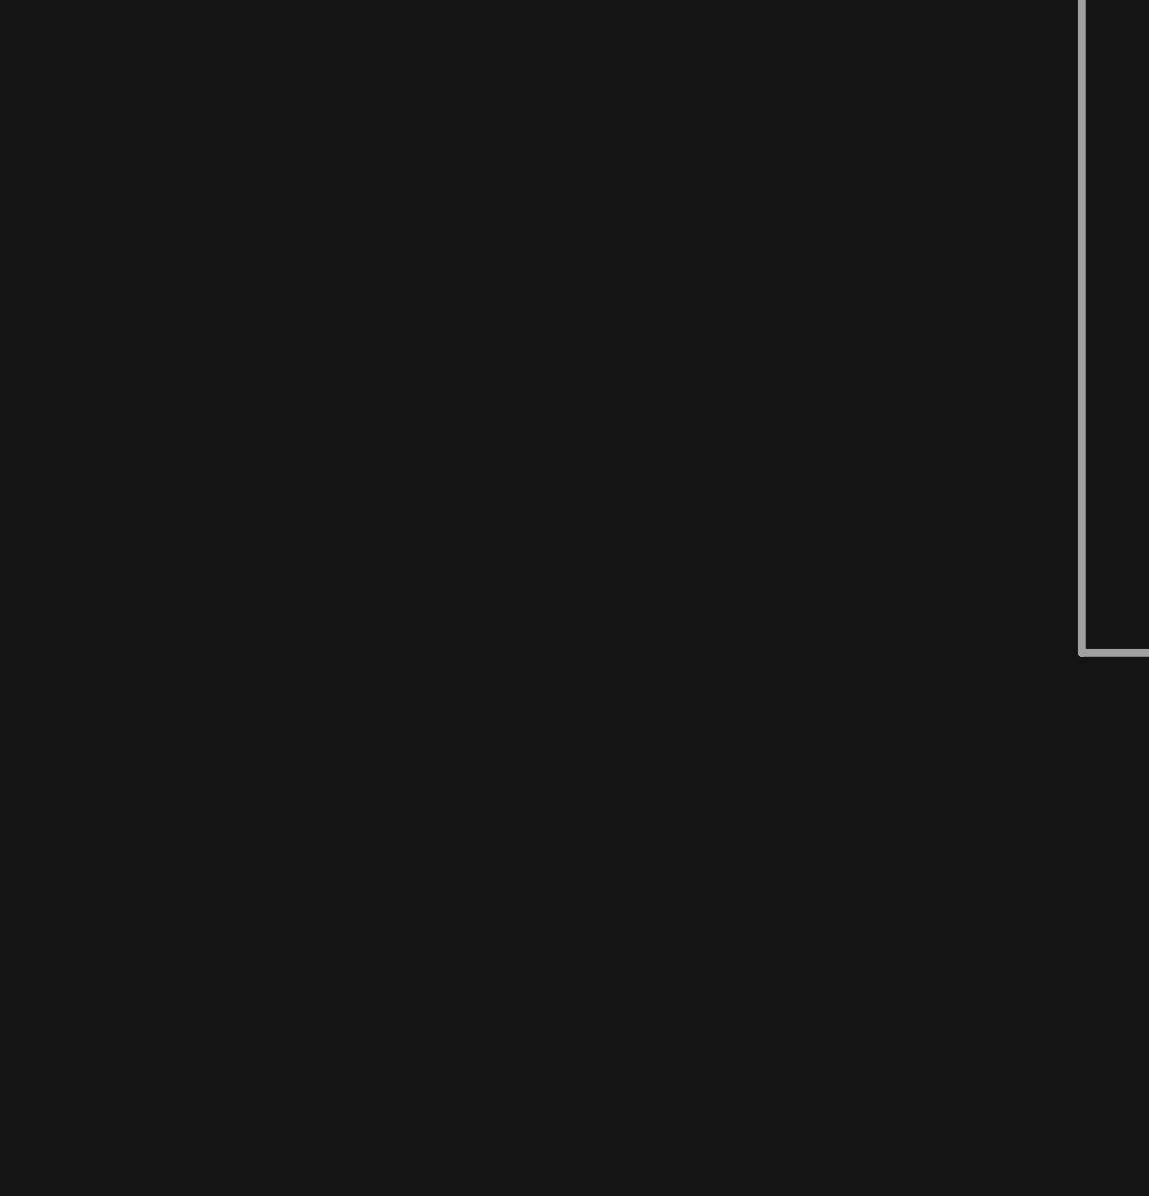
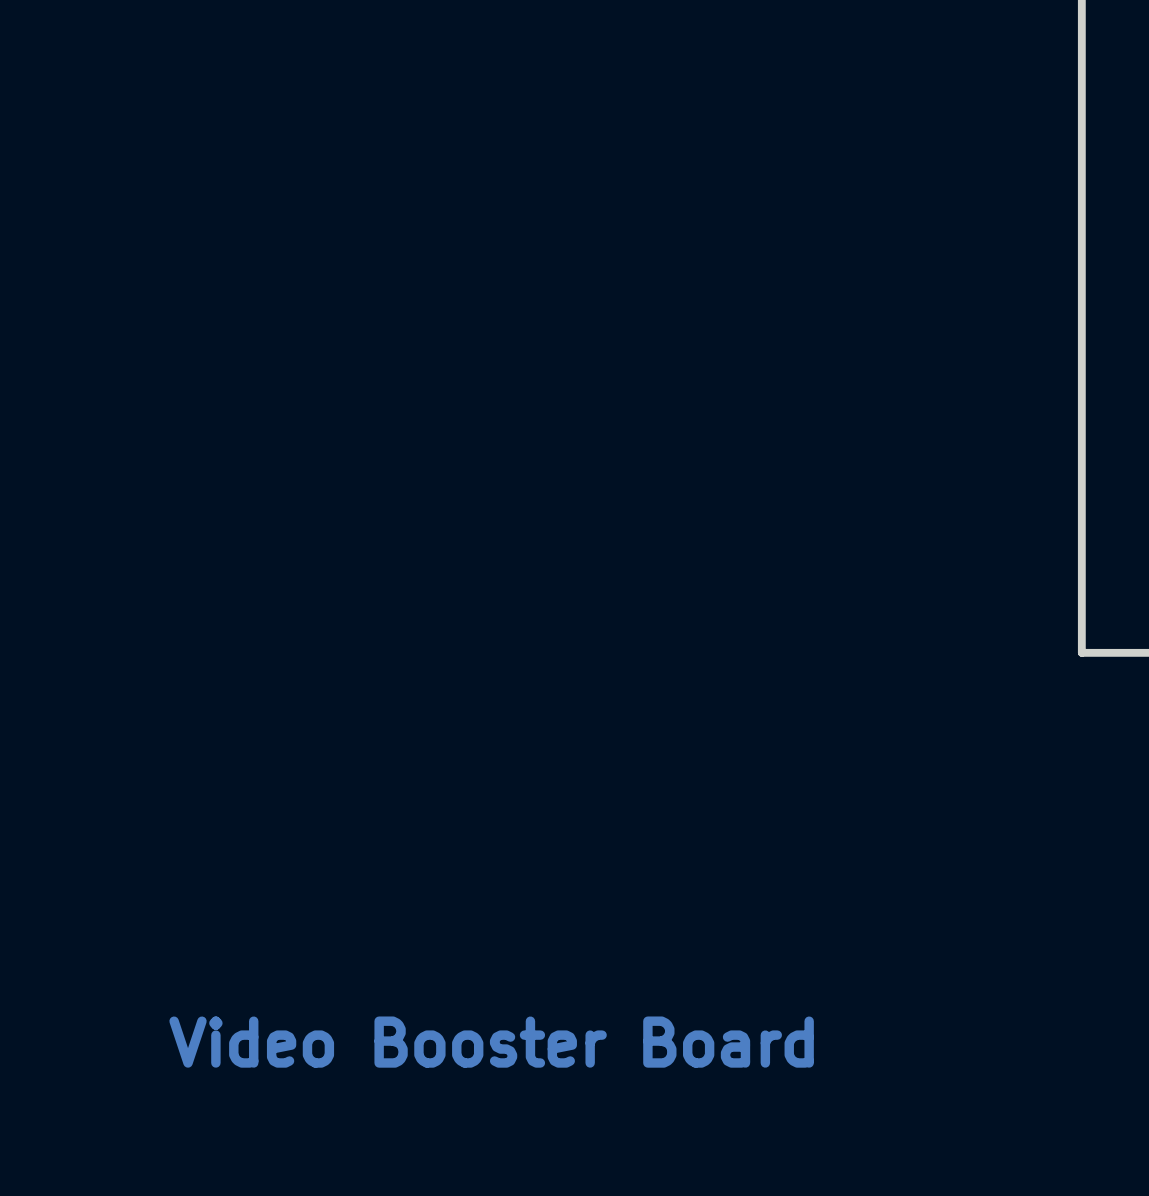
text: none -> Video Booster Board (491, 1042)

